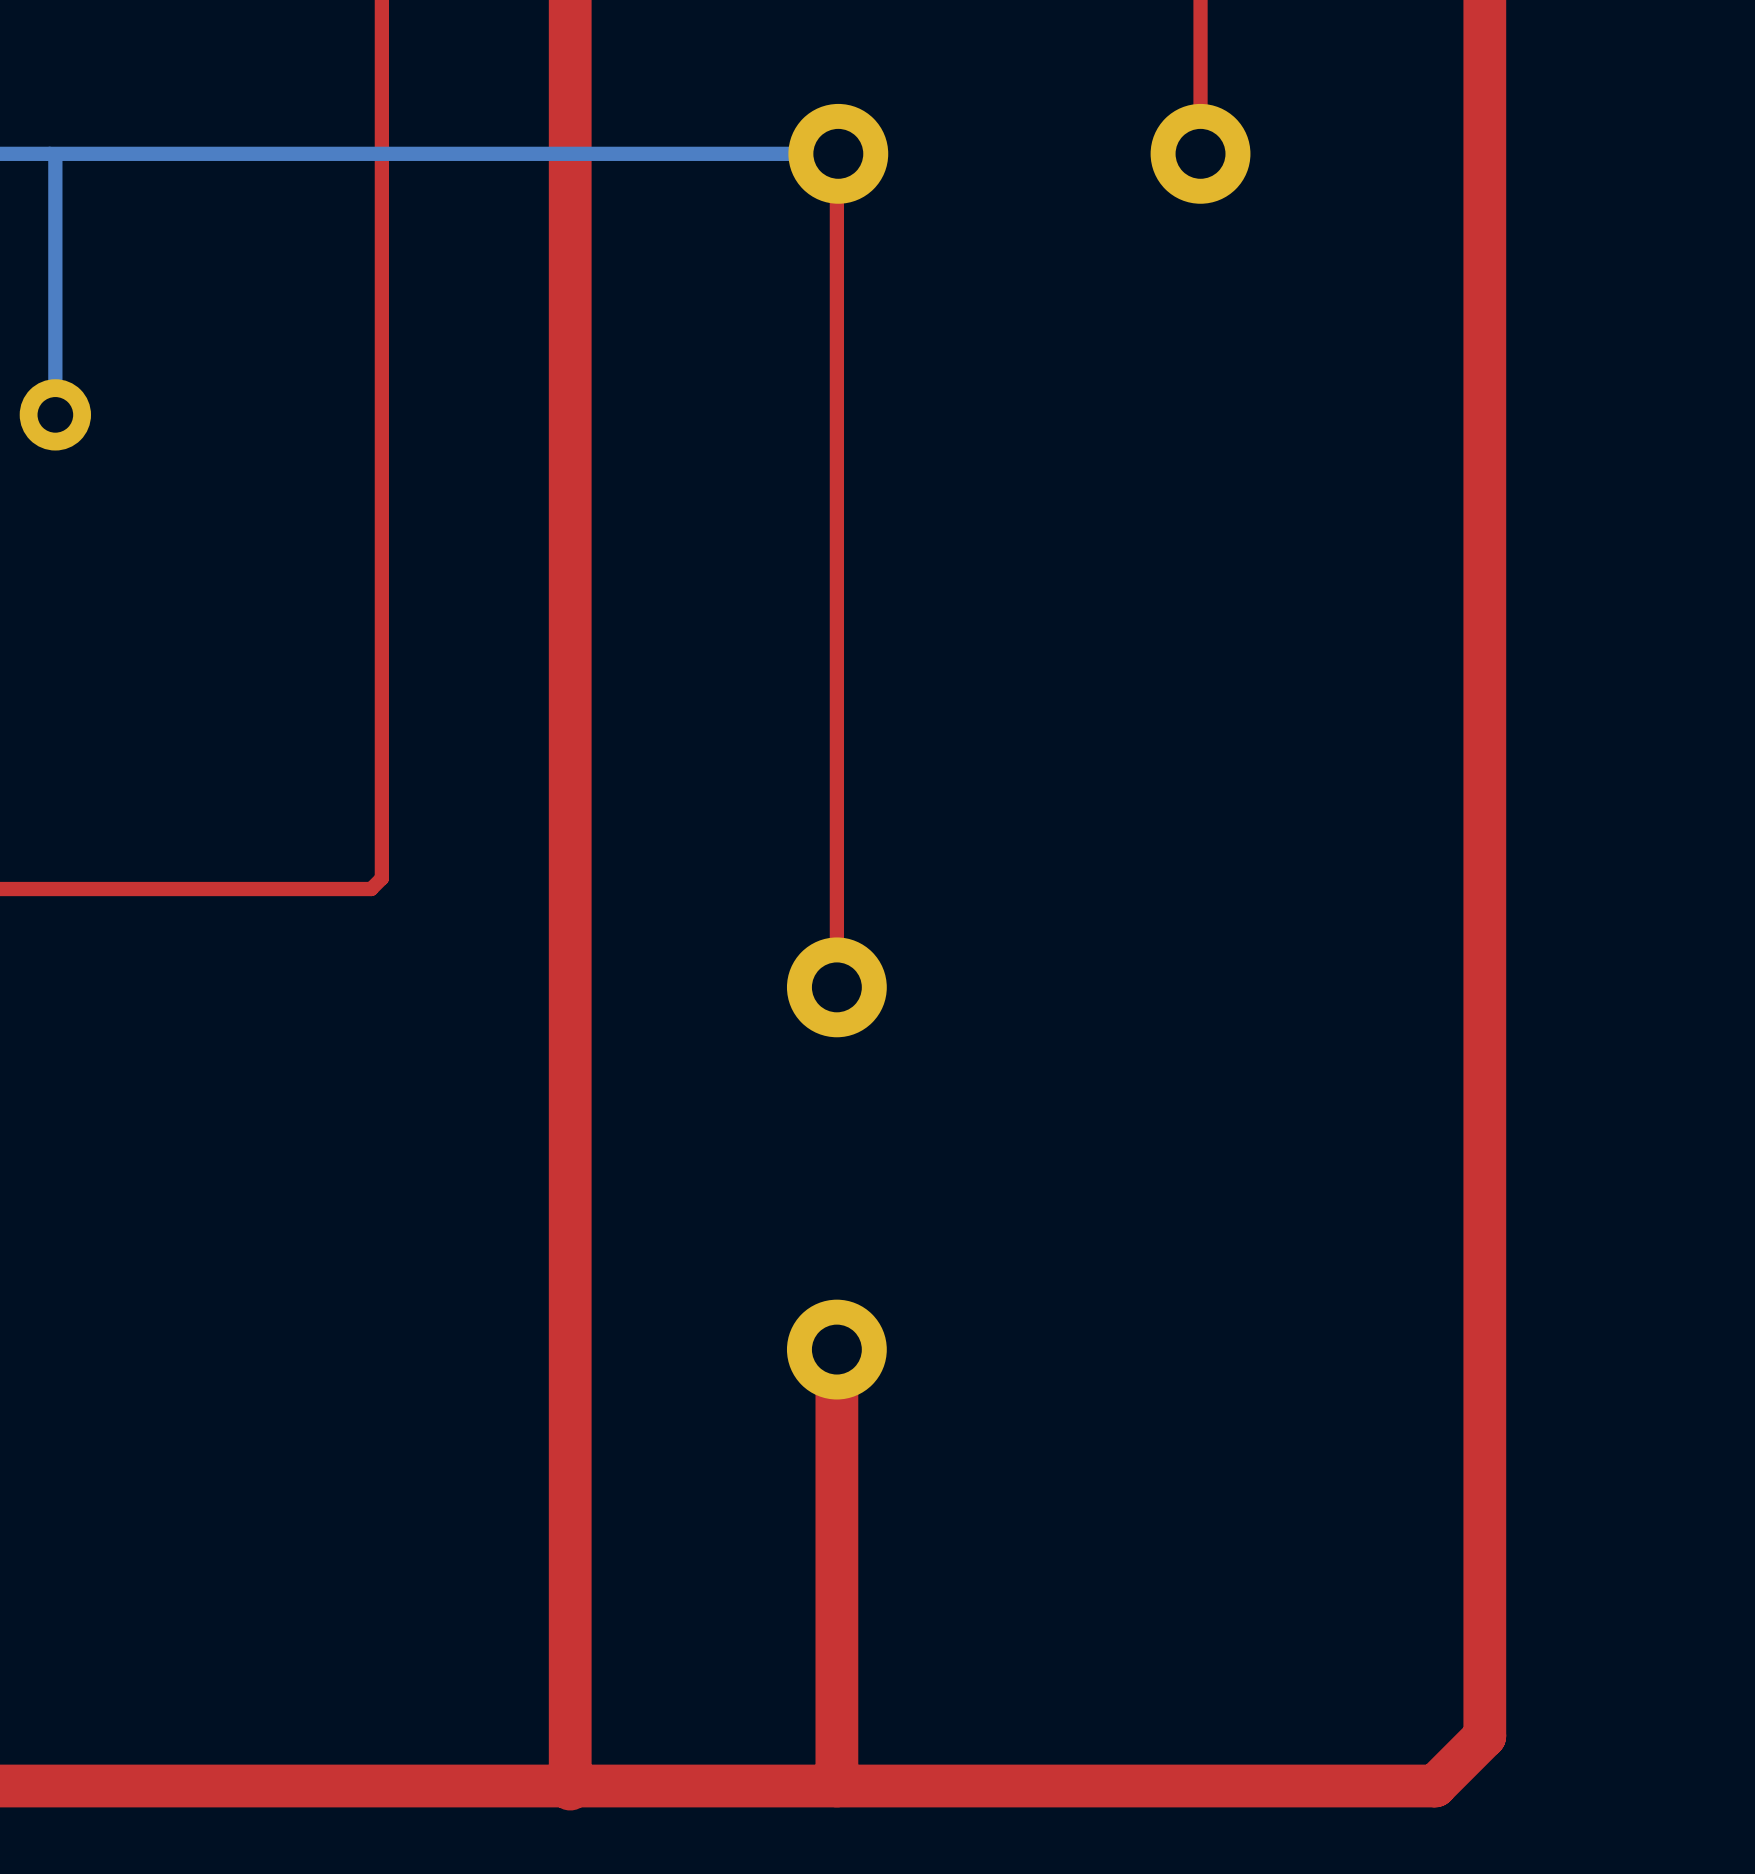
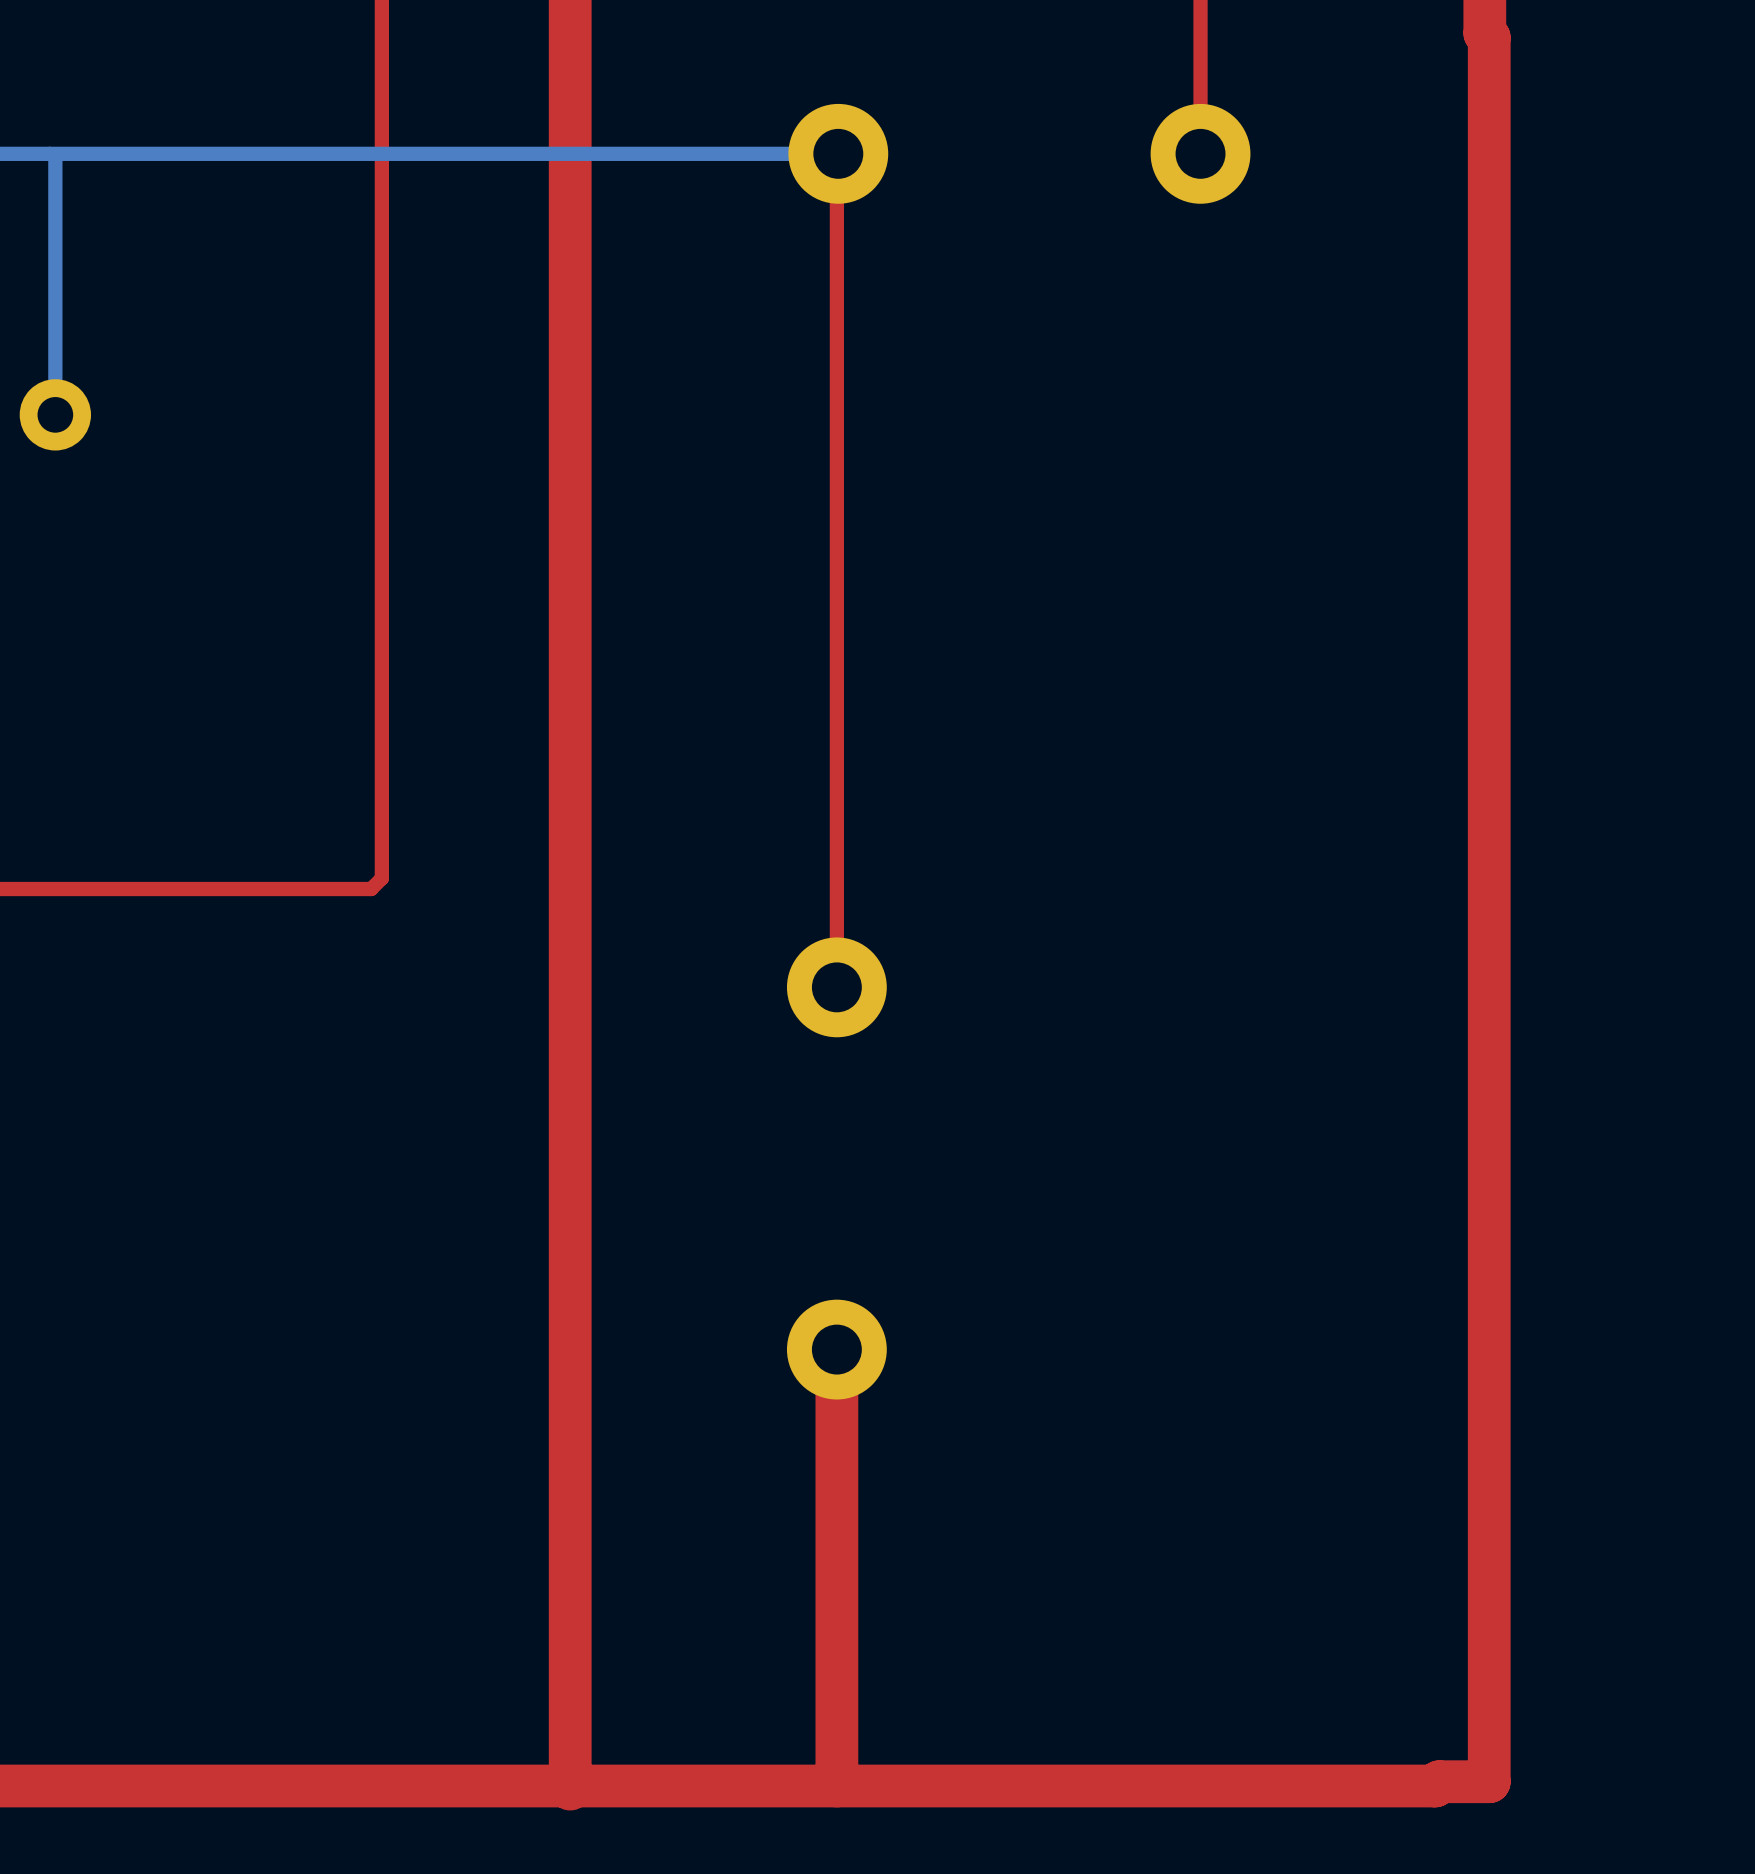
top track: (1484, 33) (1484, 1736) (1439, 1781) -> (1484, 33) (1489, 37) (1489, 1781) (1439, 1781)

